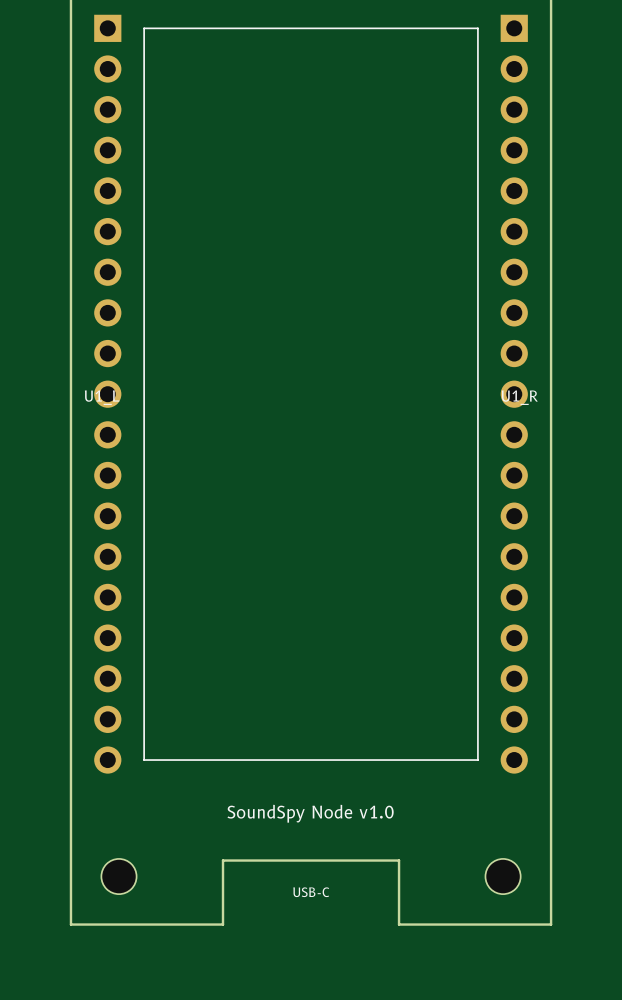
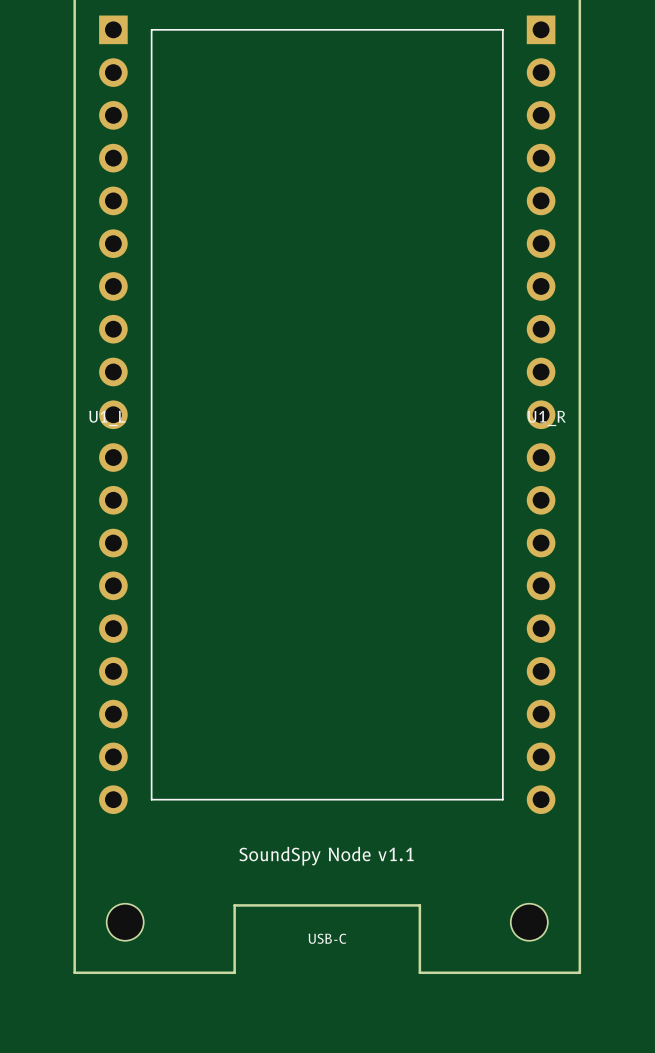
text: SoundSpy Node v1.0 (310, 813) -> SoundSpy Node v1.1 (326, 856)

